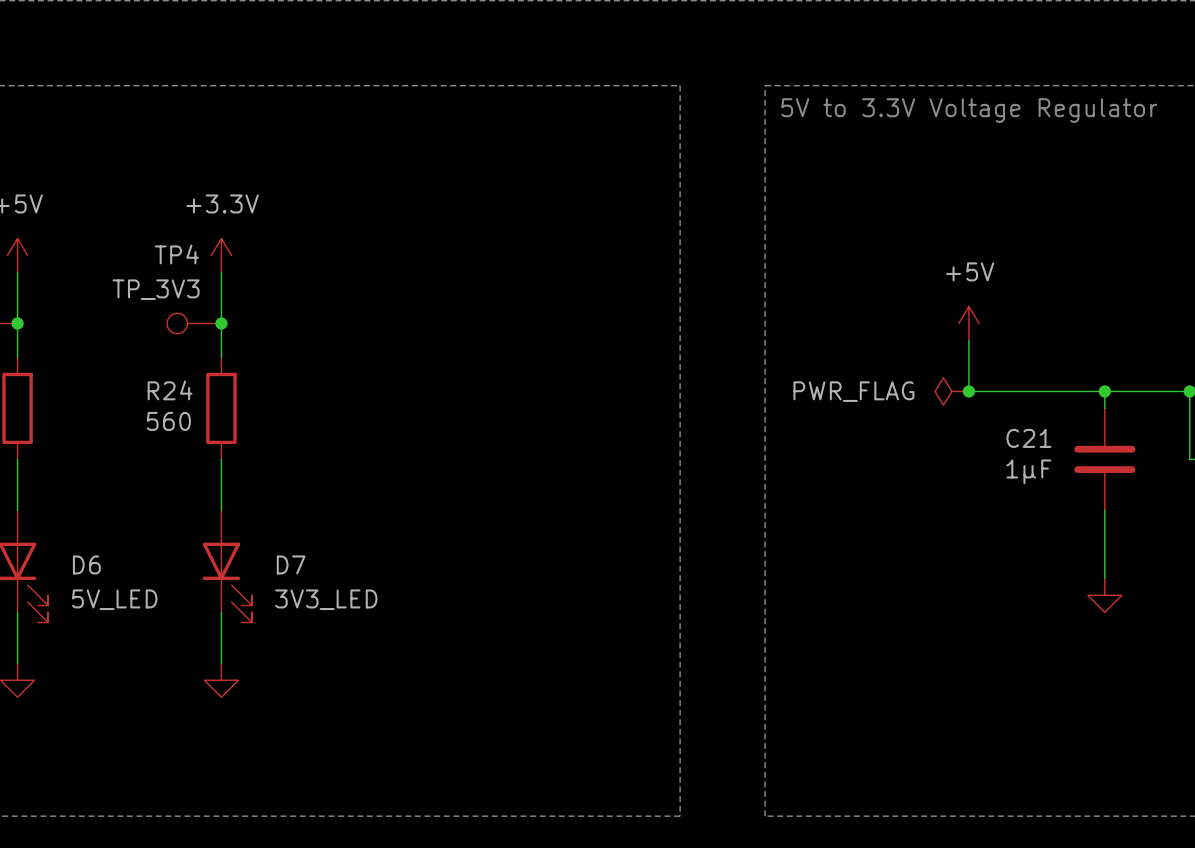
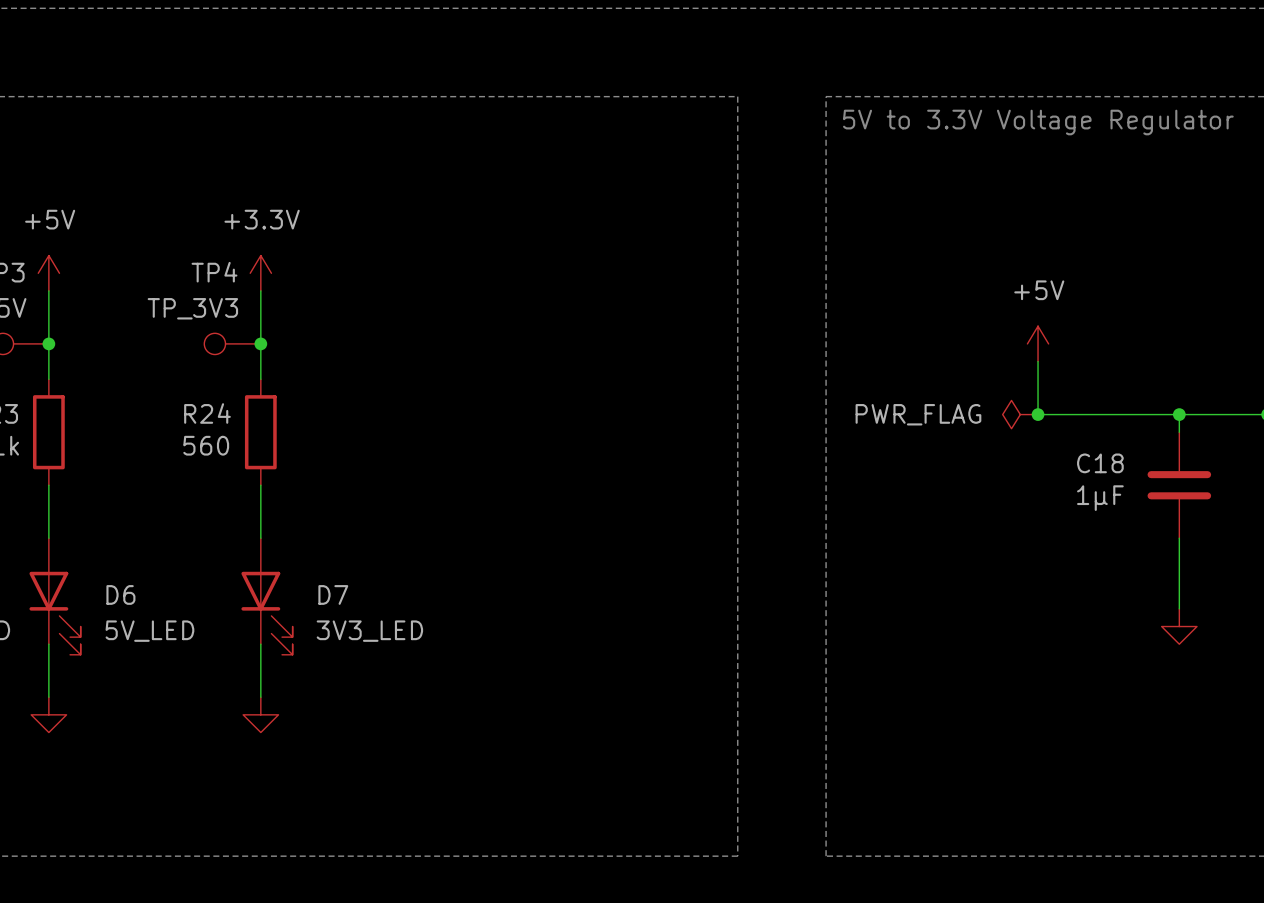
C21 name: C21 (1028, 438) -> C18 (1100, 463)

